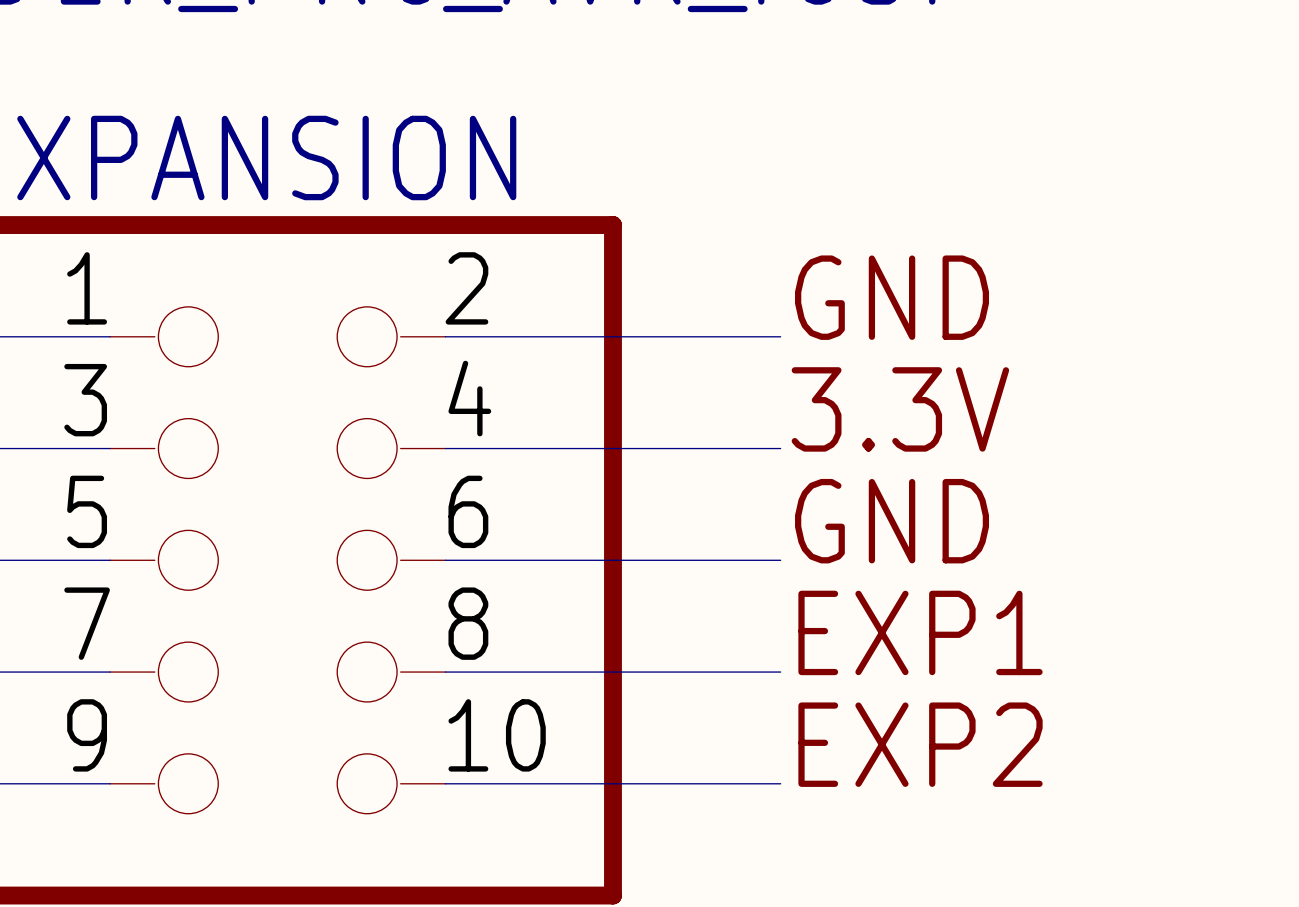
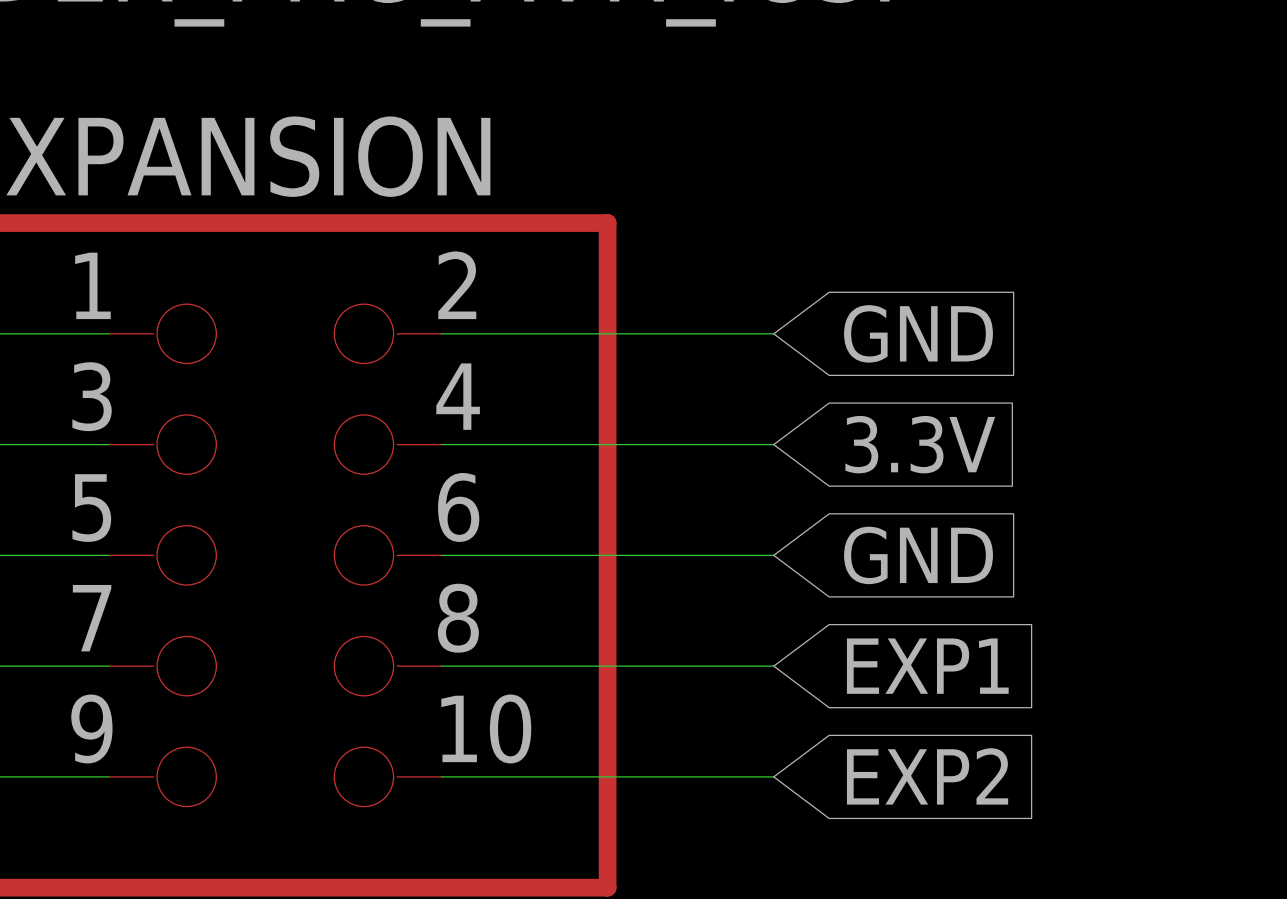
label: GND (892, 297) -> none
global label: none -> GND (918, 333)
label: 3.3V (900, 409) -> none
global label: none -> 3.3V (920, 444)
label: GND (892, 521) -> none
global label: none -> GND (918, 555)
label: EXP1 (920, 632) -> none
global label: none -> EXP1 (927, 666)
label: EXP2 (920, 744) -> none
global label: none -> EXP2 (927, 776)

